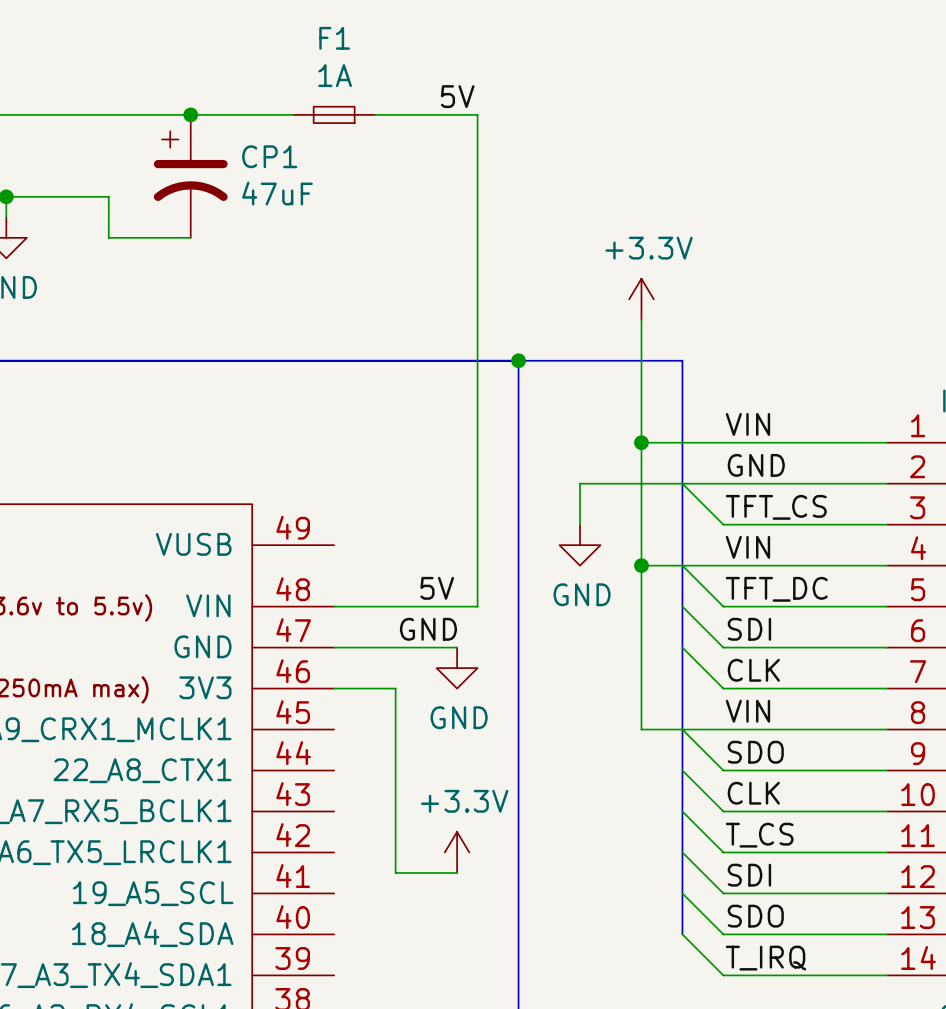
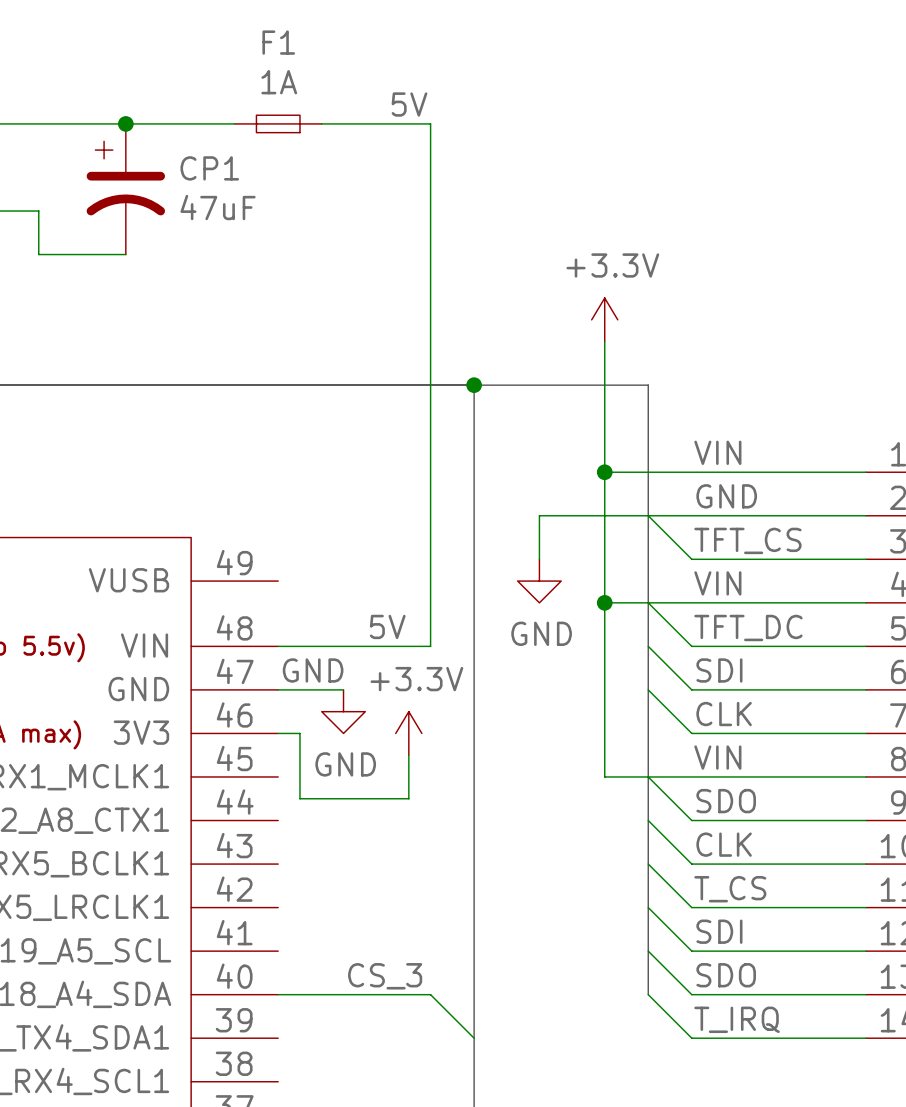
label position: GND (428, 629) -> GND (313, 670)
wire: (395, 647) (457, 647) -> none
power symbol position: GND (457, 668) -> GND (343, 711)
wire: (354, 688) (395, 688) (395, 872) (457, 872) -> (299, 733) (299, 798) (408, 798) (408, 755)
power symbol position: +3.3V (457, 852) -> +3.3V (408, 733)
label: none -> CS_3 (385, 976)
wire: none -> (278, 994) (430, 994) (474, 1038)

